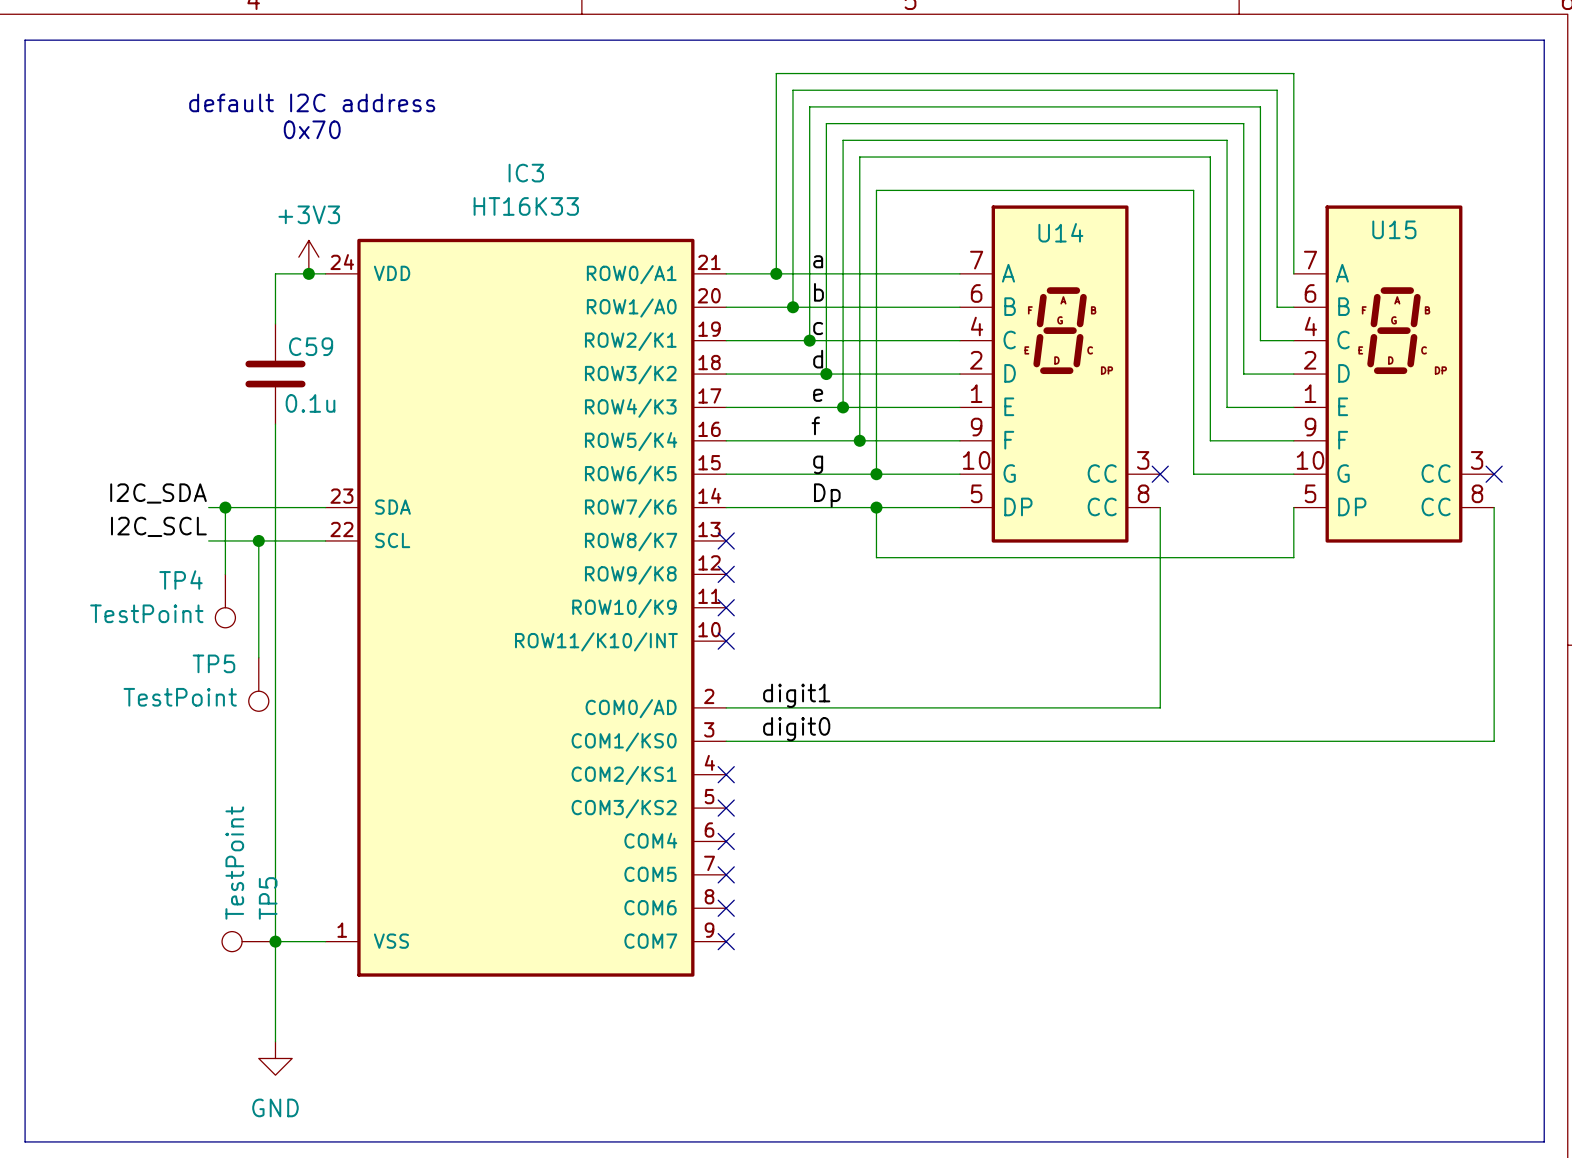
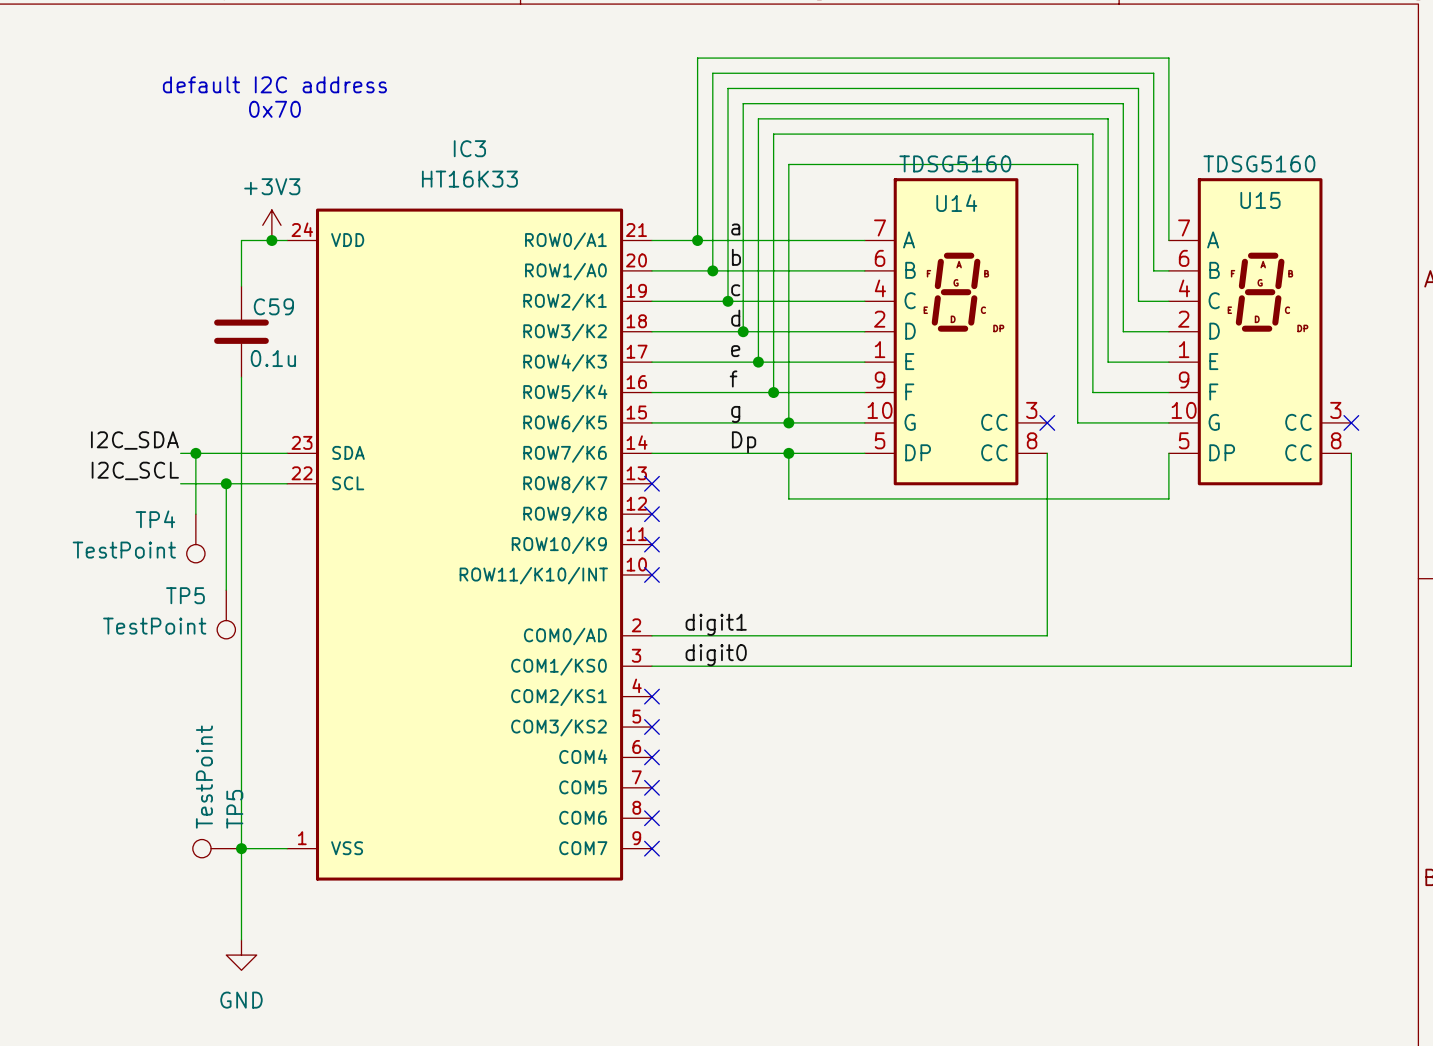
line: (25, 40) (1544, 40) (1544, 1141) (25, 1141) (25, 40) -> none
U14 value: none -> TDSG5160 (955, 163)
U15 value: none -> TDSG5160 (1259, 163)

